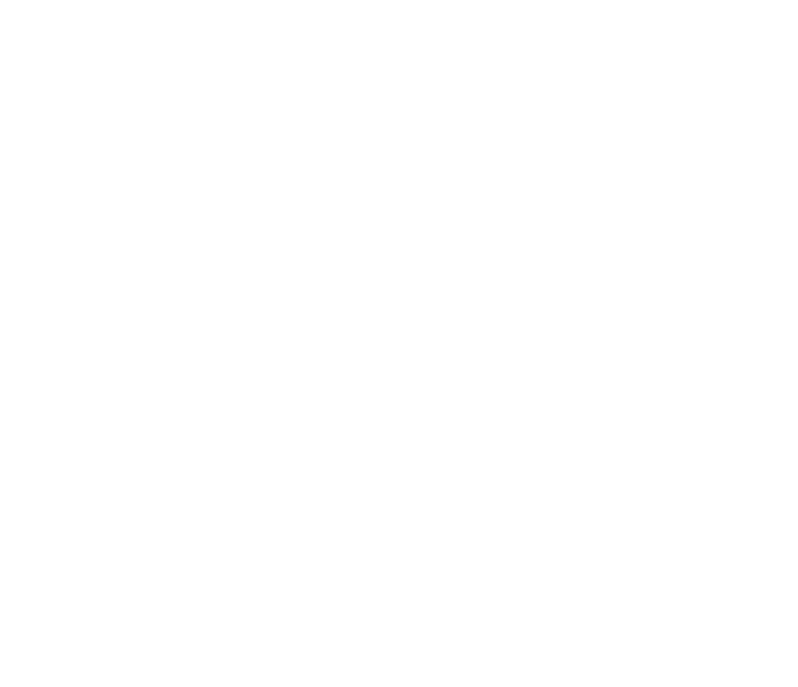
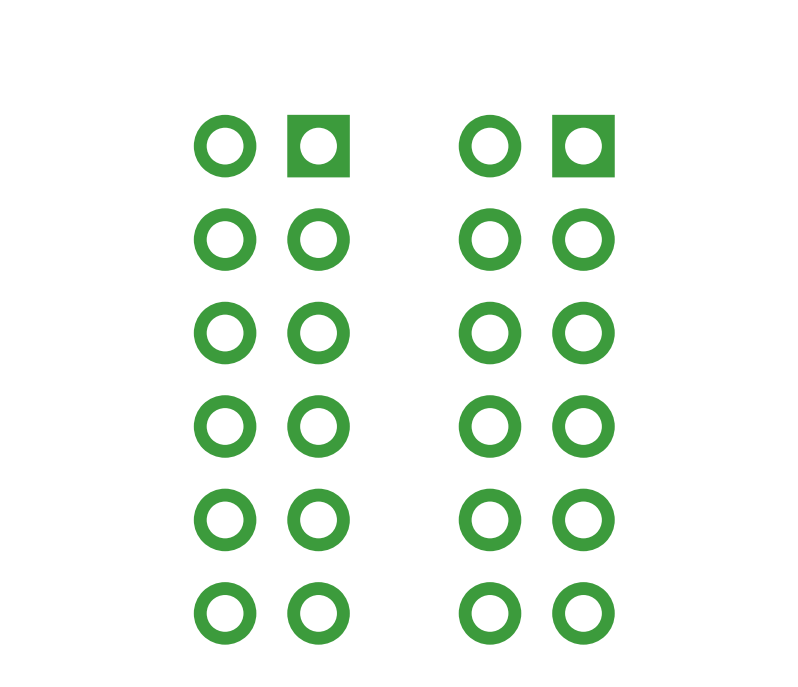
part: none -> (271, 379)
part: none -> (536, 379)

